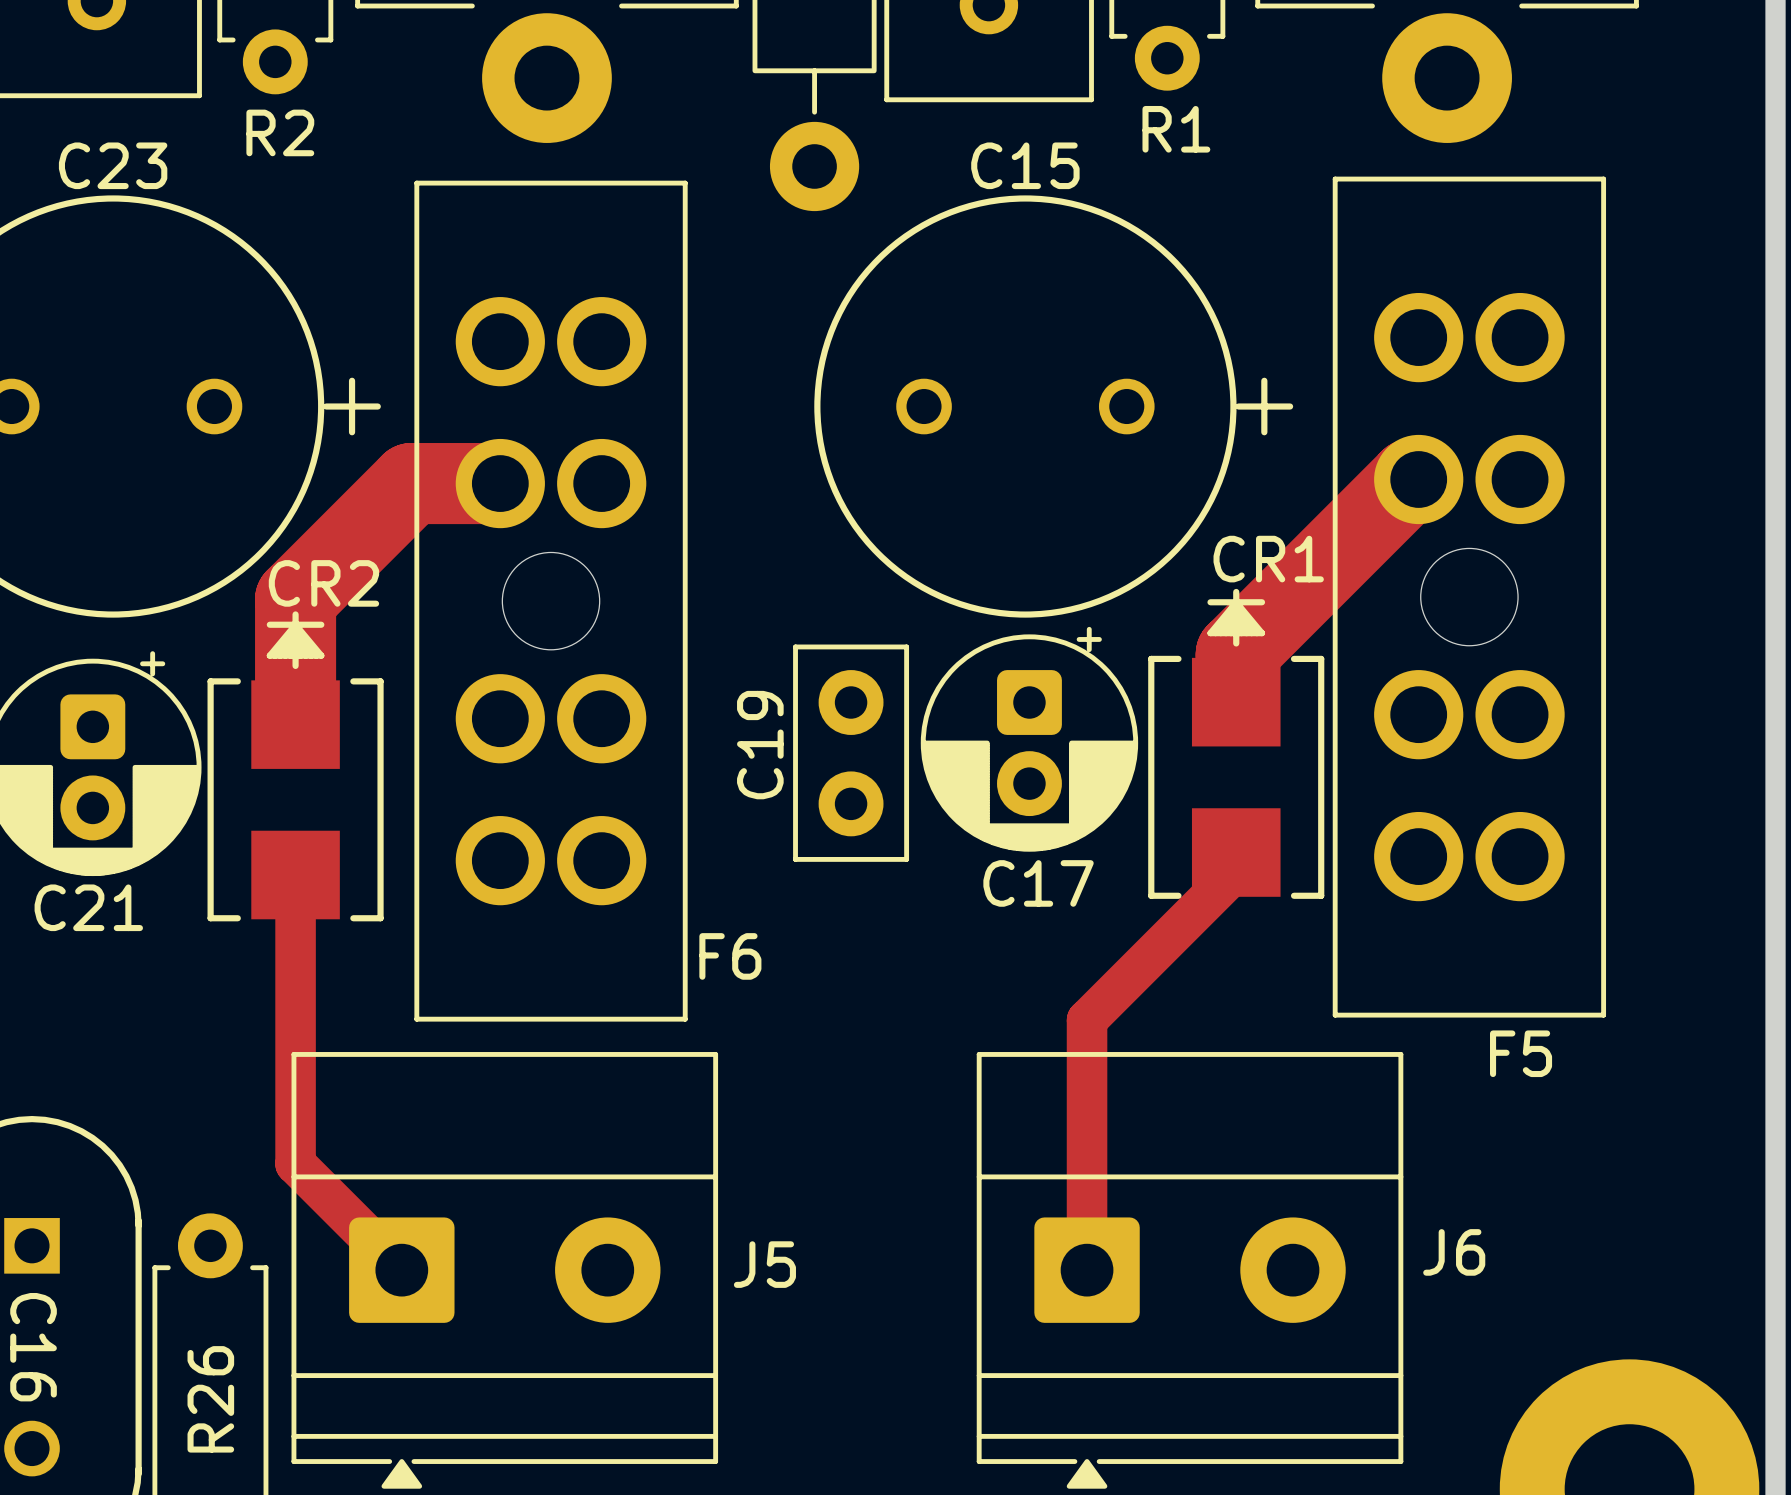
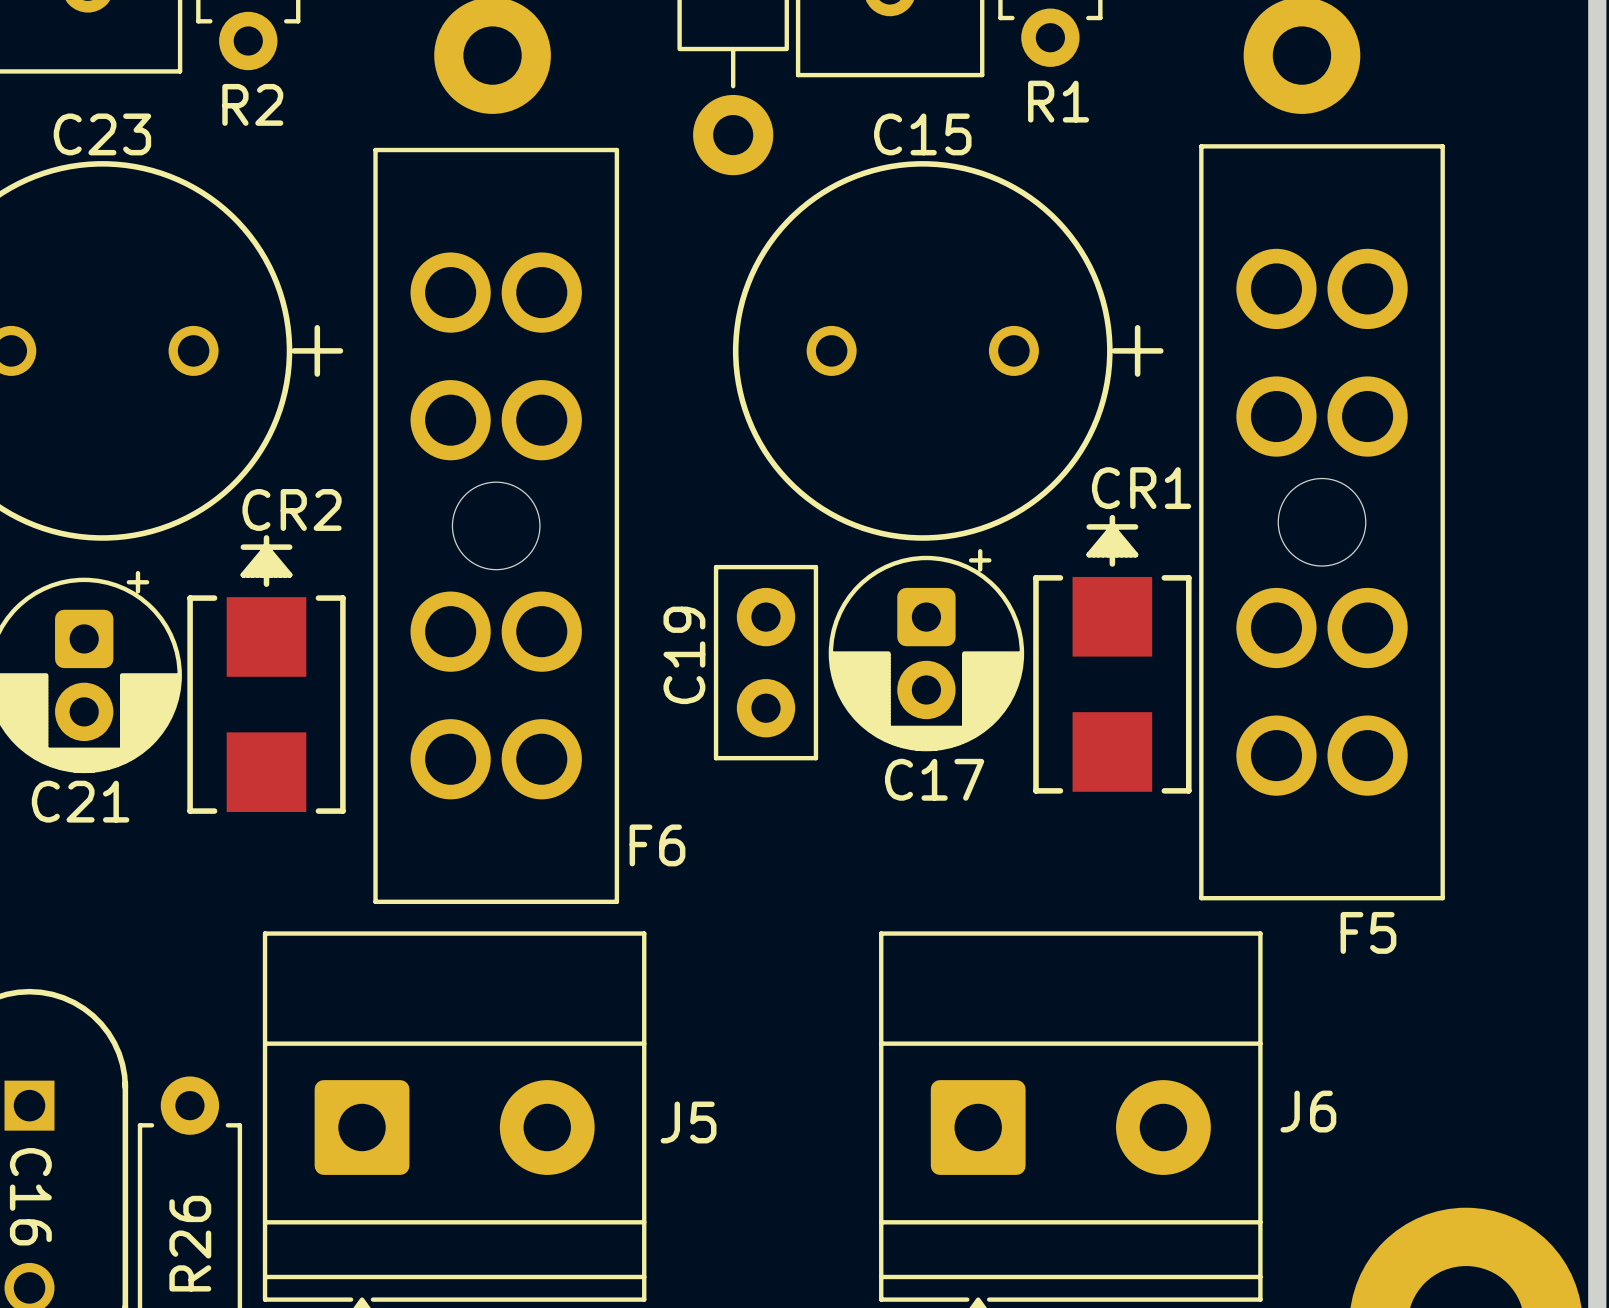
track: (1418, 479) (1410, 479) (1236, 653) (1236, 702) -> none
track: (500, 483) (411, 483) (295, 599) (295, 724) -> none
track: (1236, 852) (1236, 870) (1087, 1020) (1087, 1270) -> none
track: (295, 875) (295, 1163) (401, 1270) -> none

